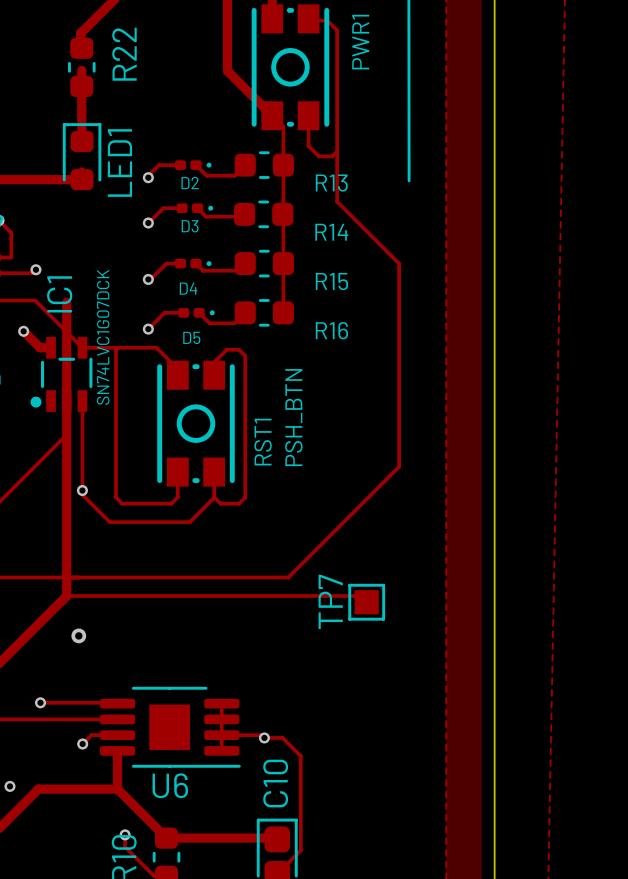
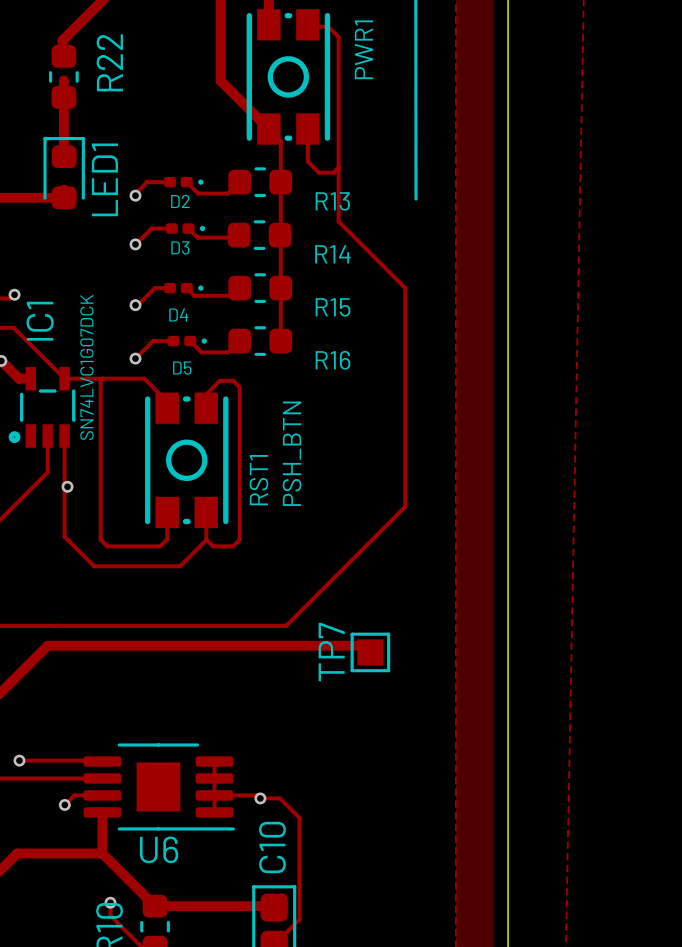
track: (66, 302) (66, 595) -> none
via position: (82, 490) -> (67, 486)
track width: thin (66, 595) (360, 595) (366, 602) -> thick (47, 645) (363, 645) (370, 652)
via: (78, 635) -> none

